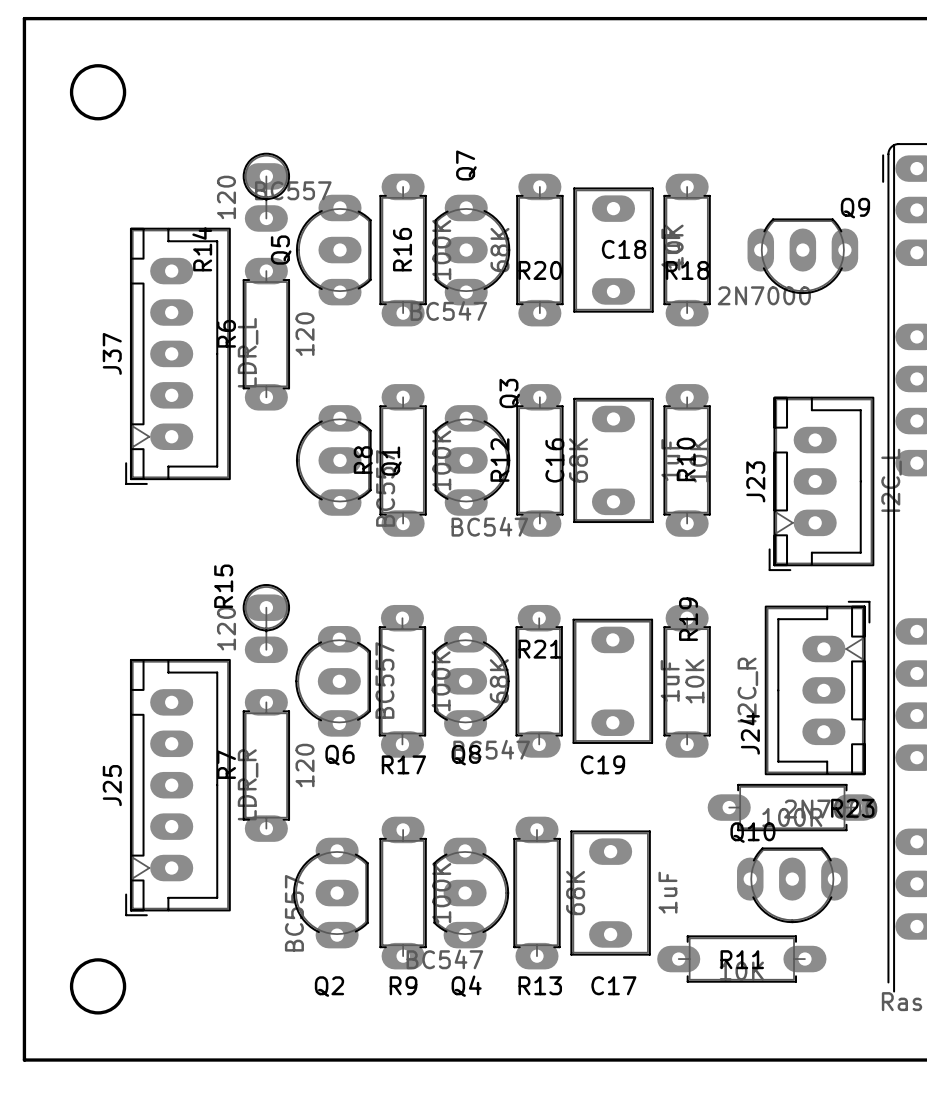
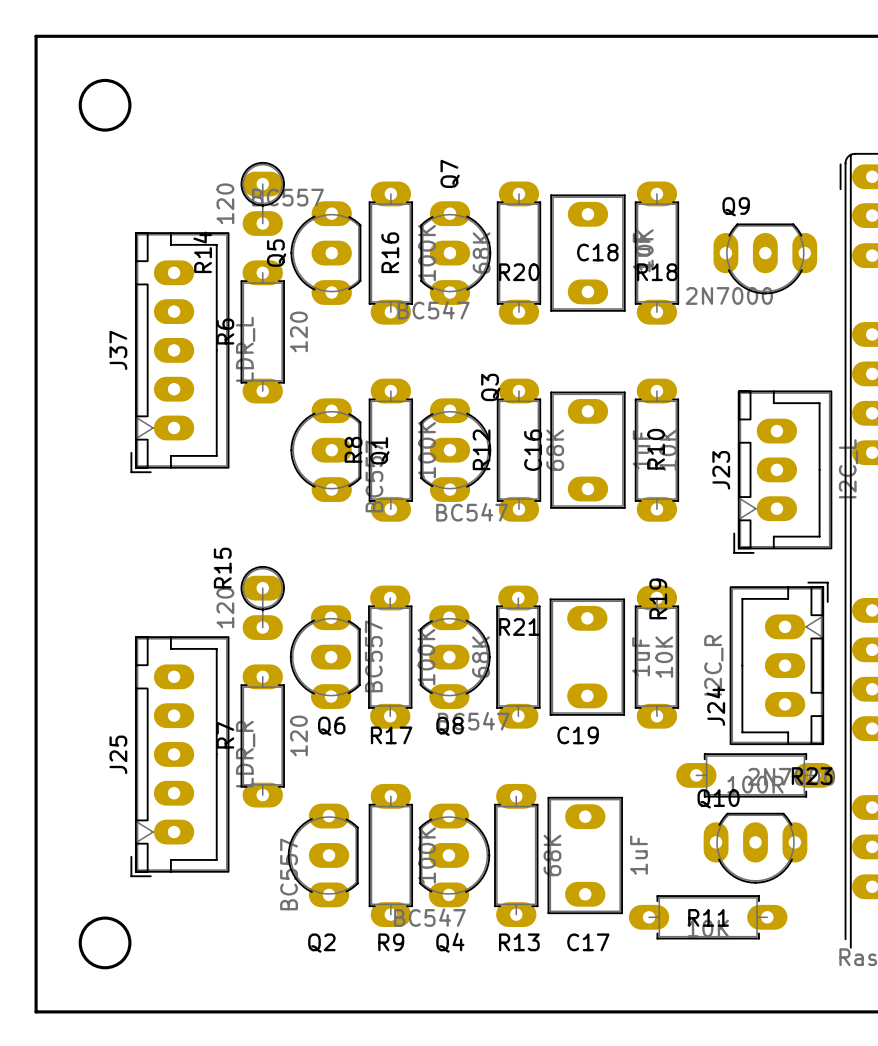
Q9 name position: Q9 (855, 208) -> Q9 (736, 206)

